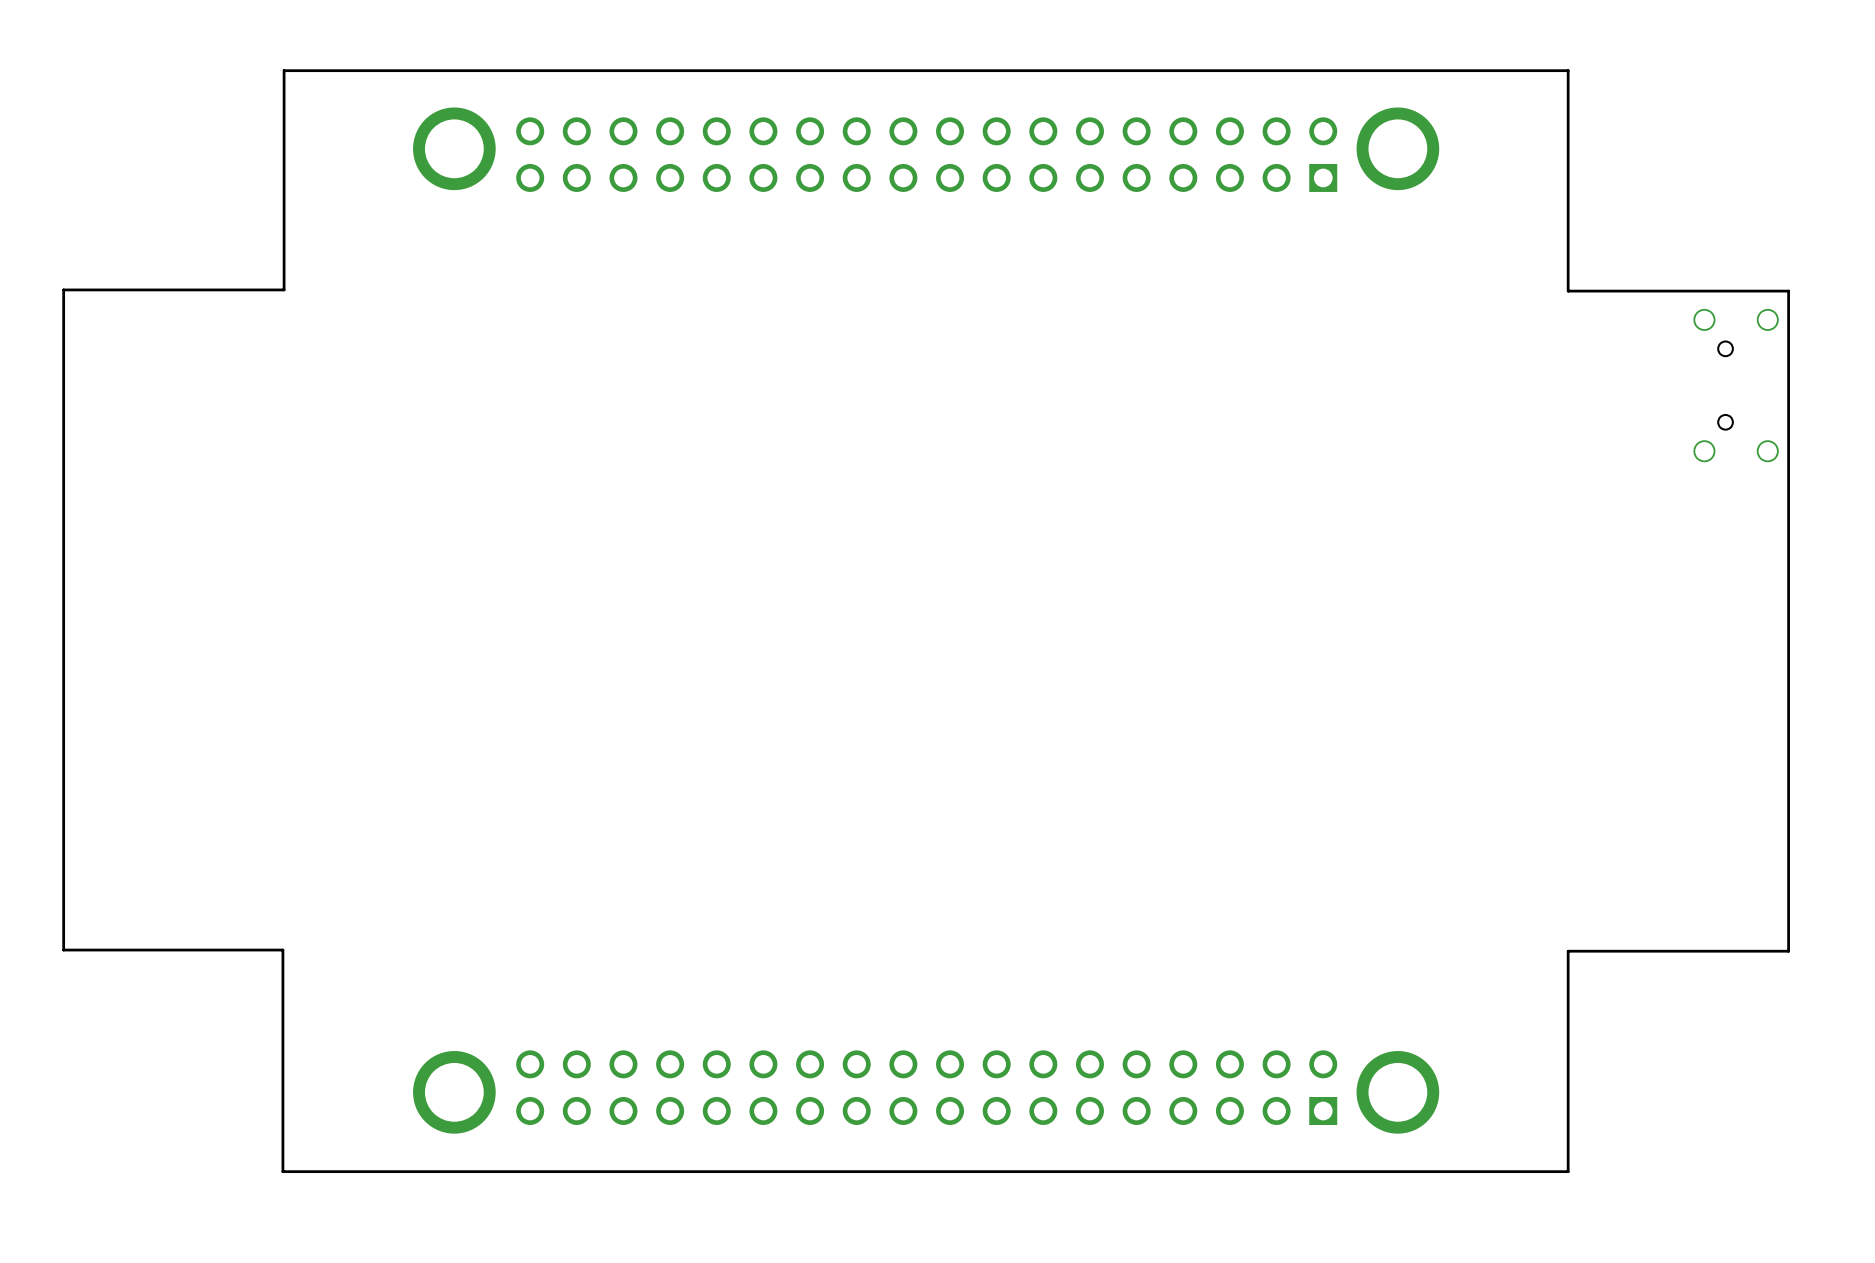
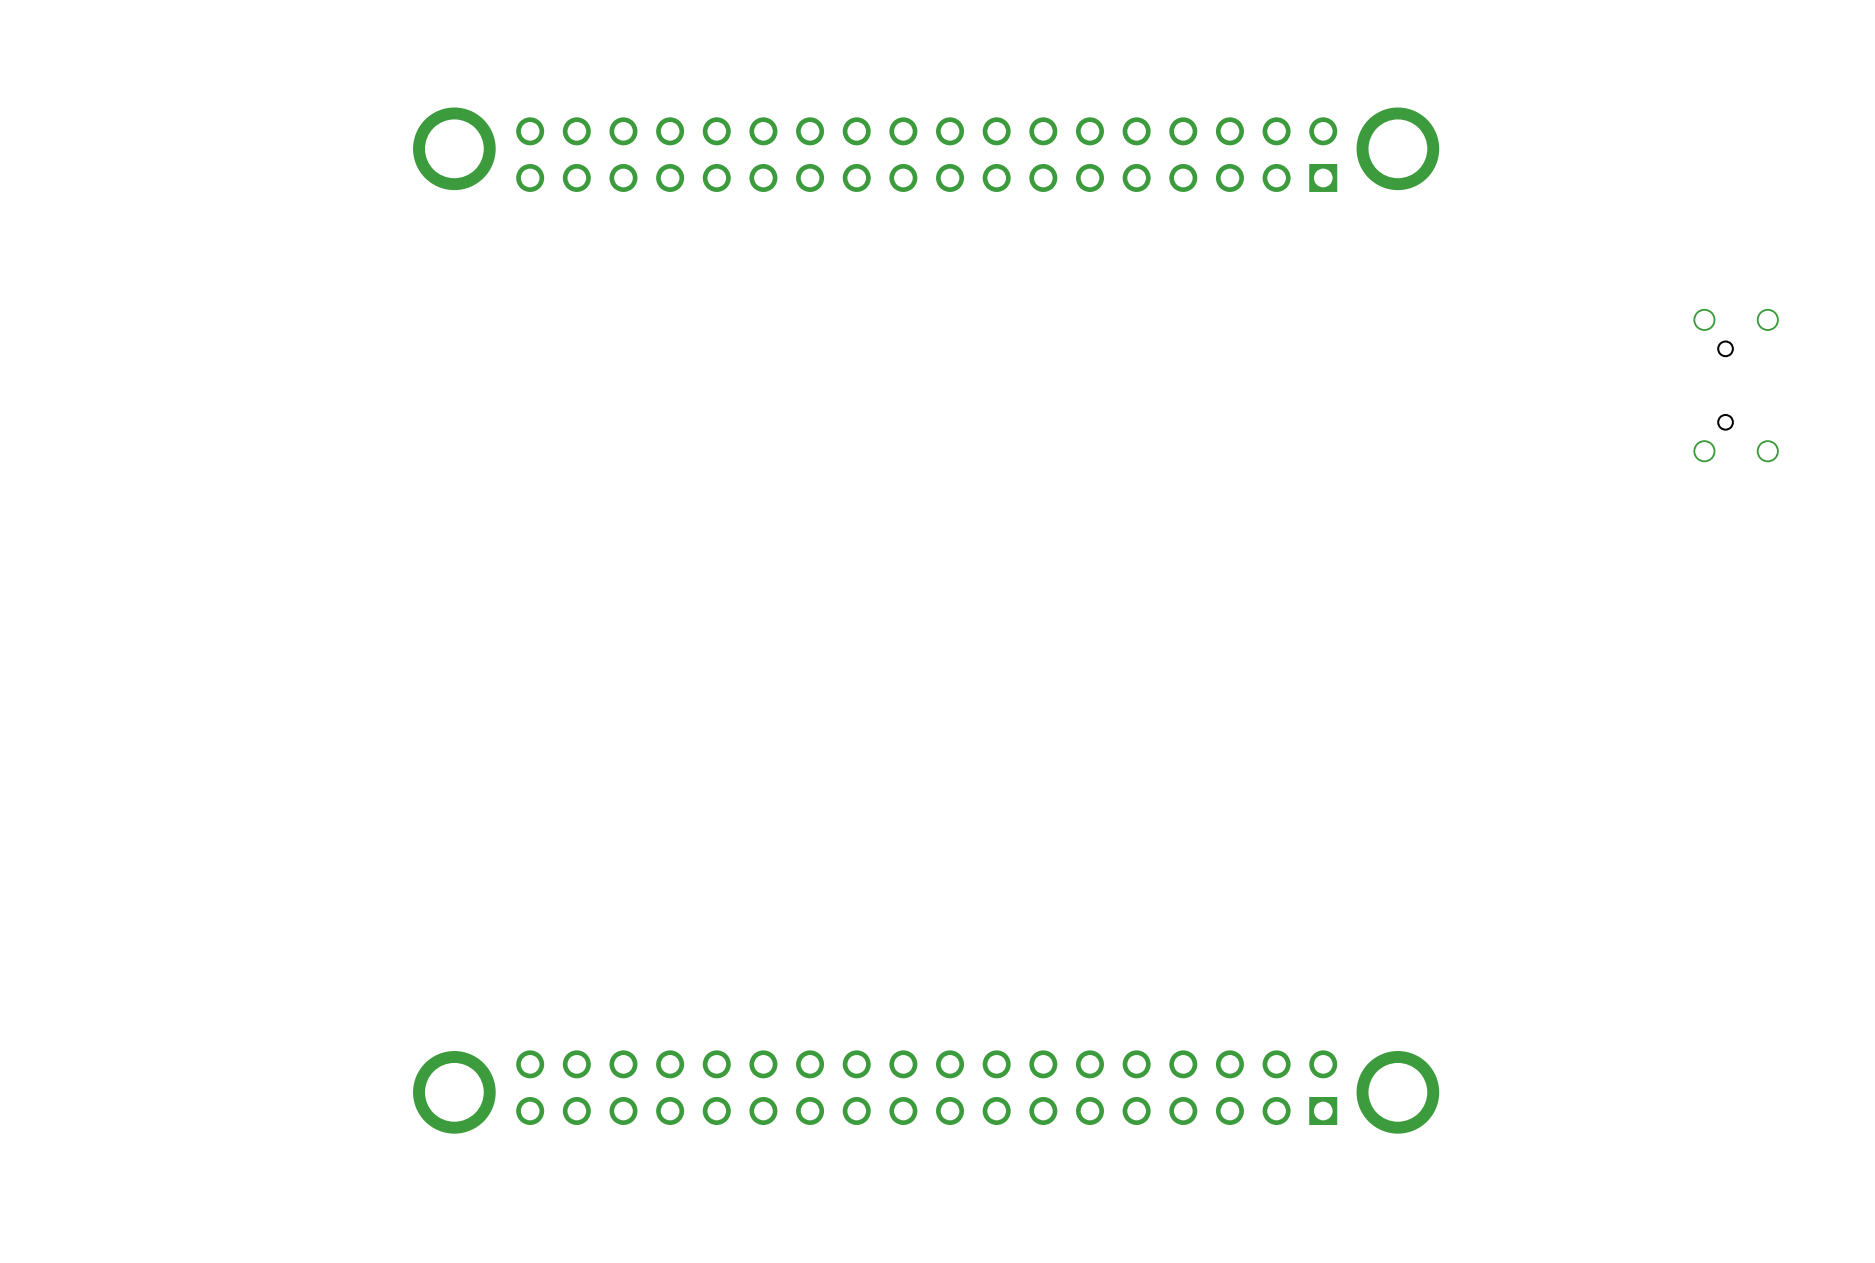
board edge: (1568, 70) (1568, 291) (1788, 291) (1788, 951) (1568, 951) (1568, 1171) (282, 1171) (282, 950) (63, 950) (63, 289) (284, 289) (284, 70) (1568, 70) -> none

